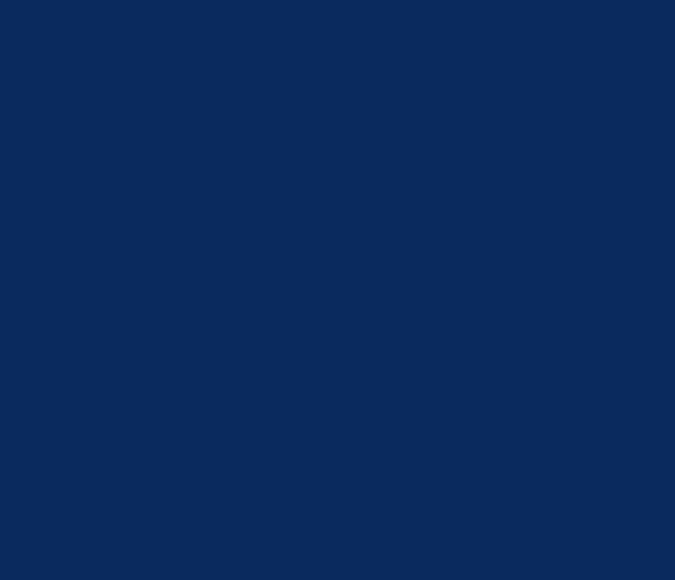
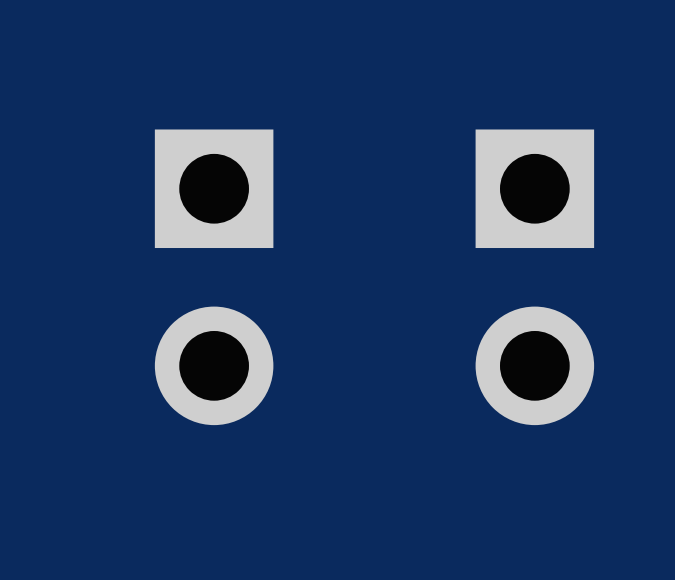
part: none -> (214, 277)
part: none -> (534, 277)

